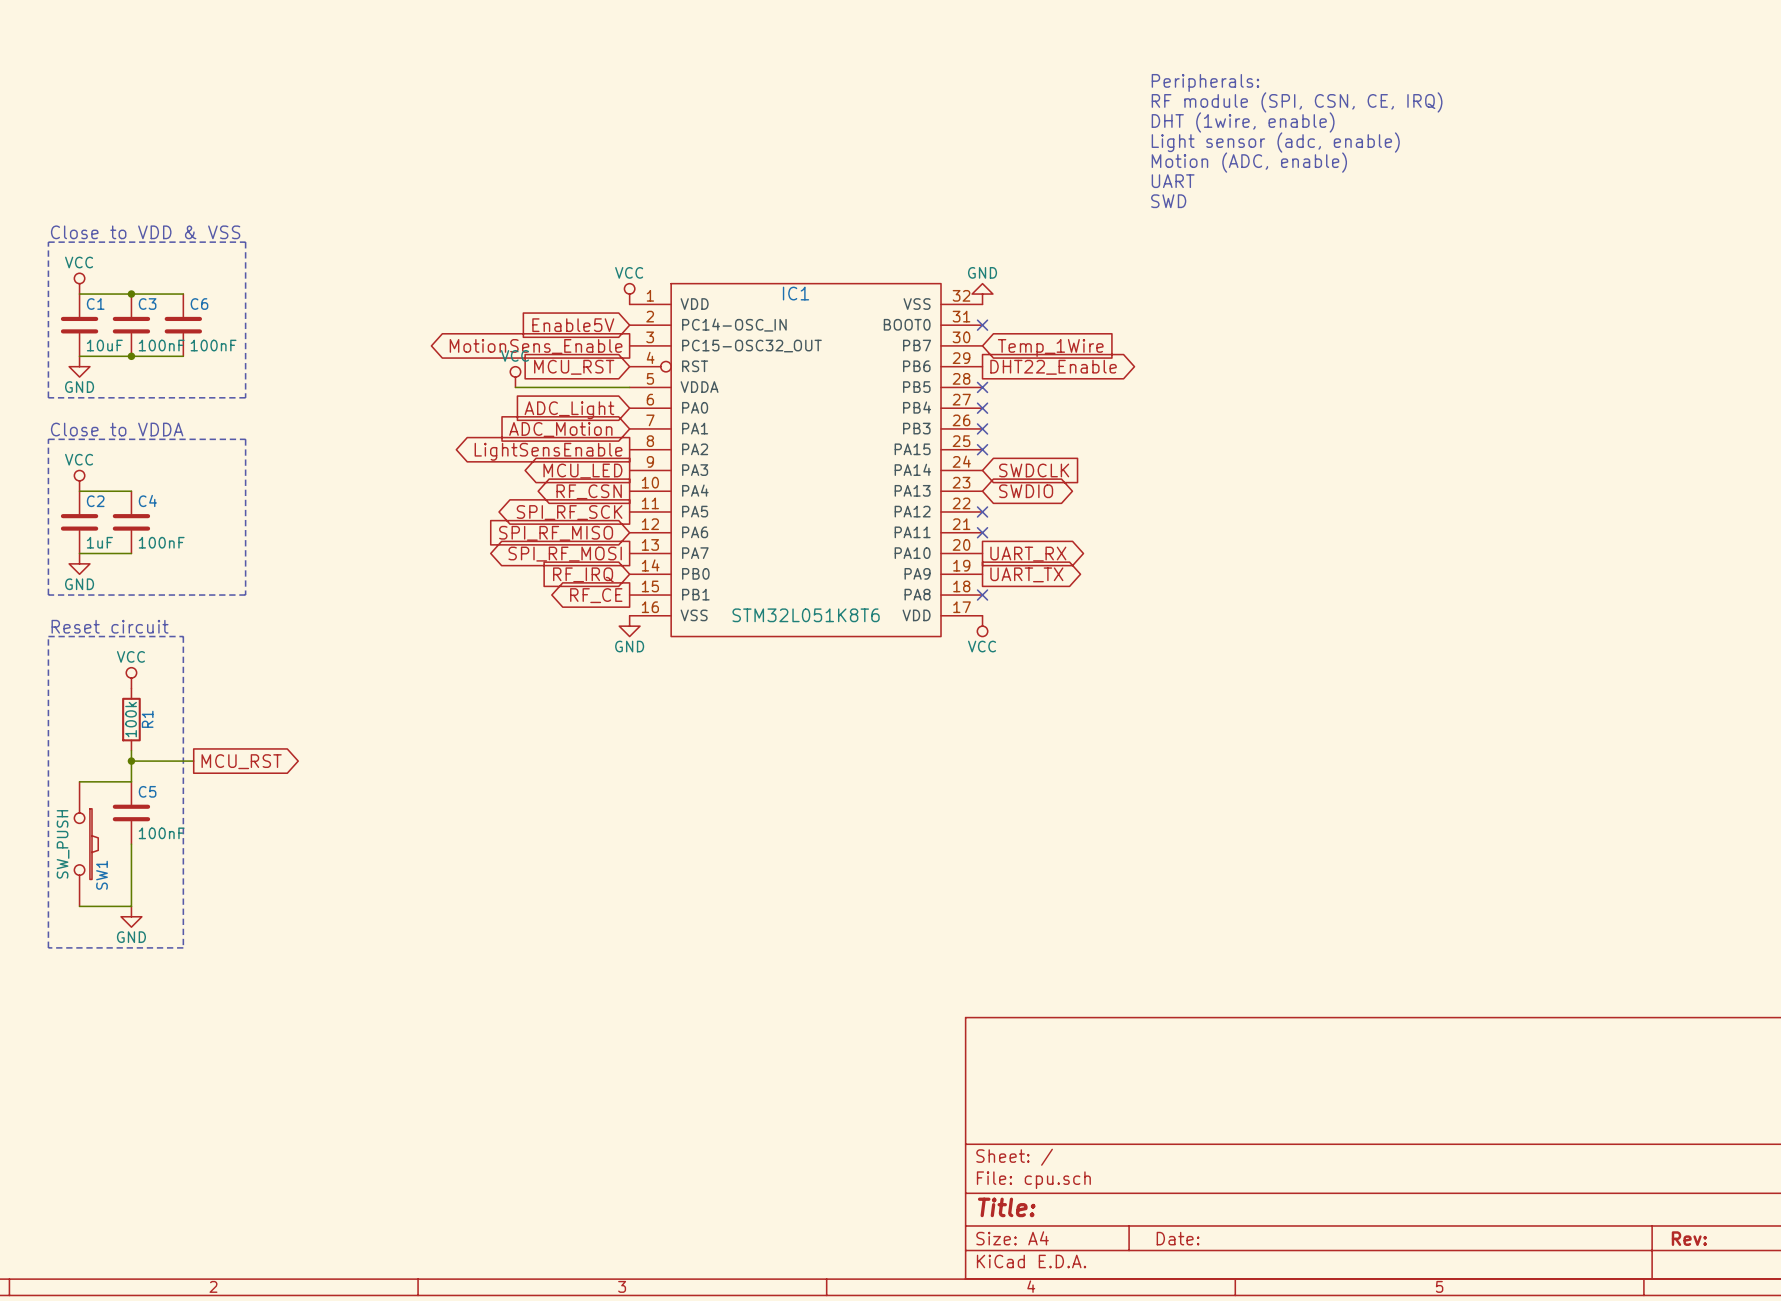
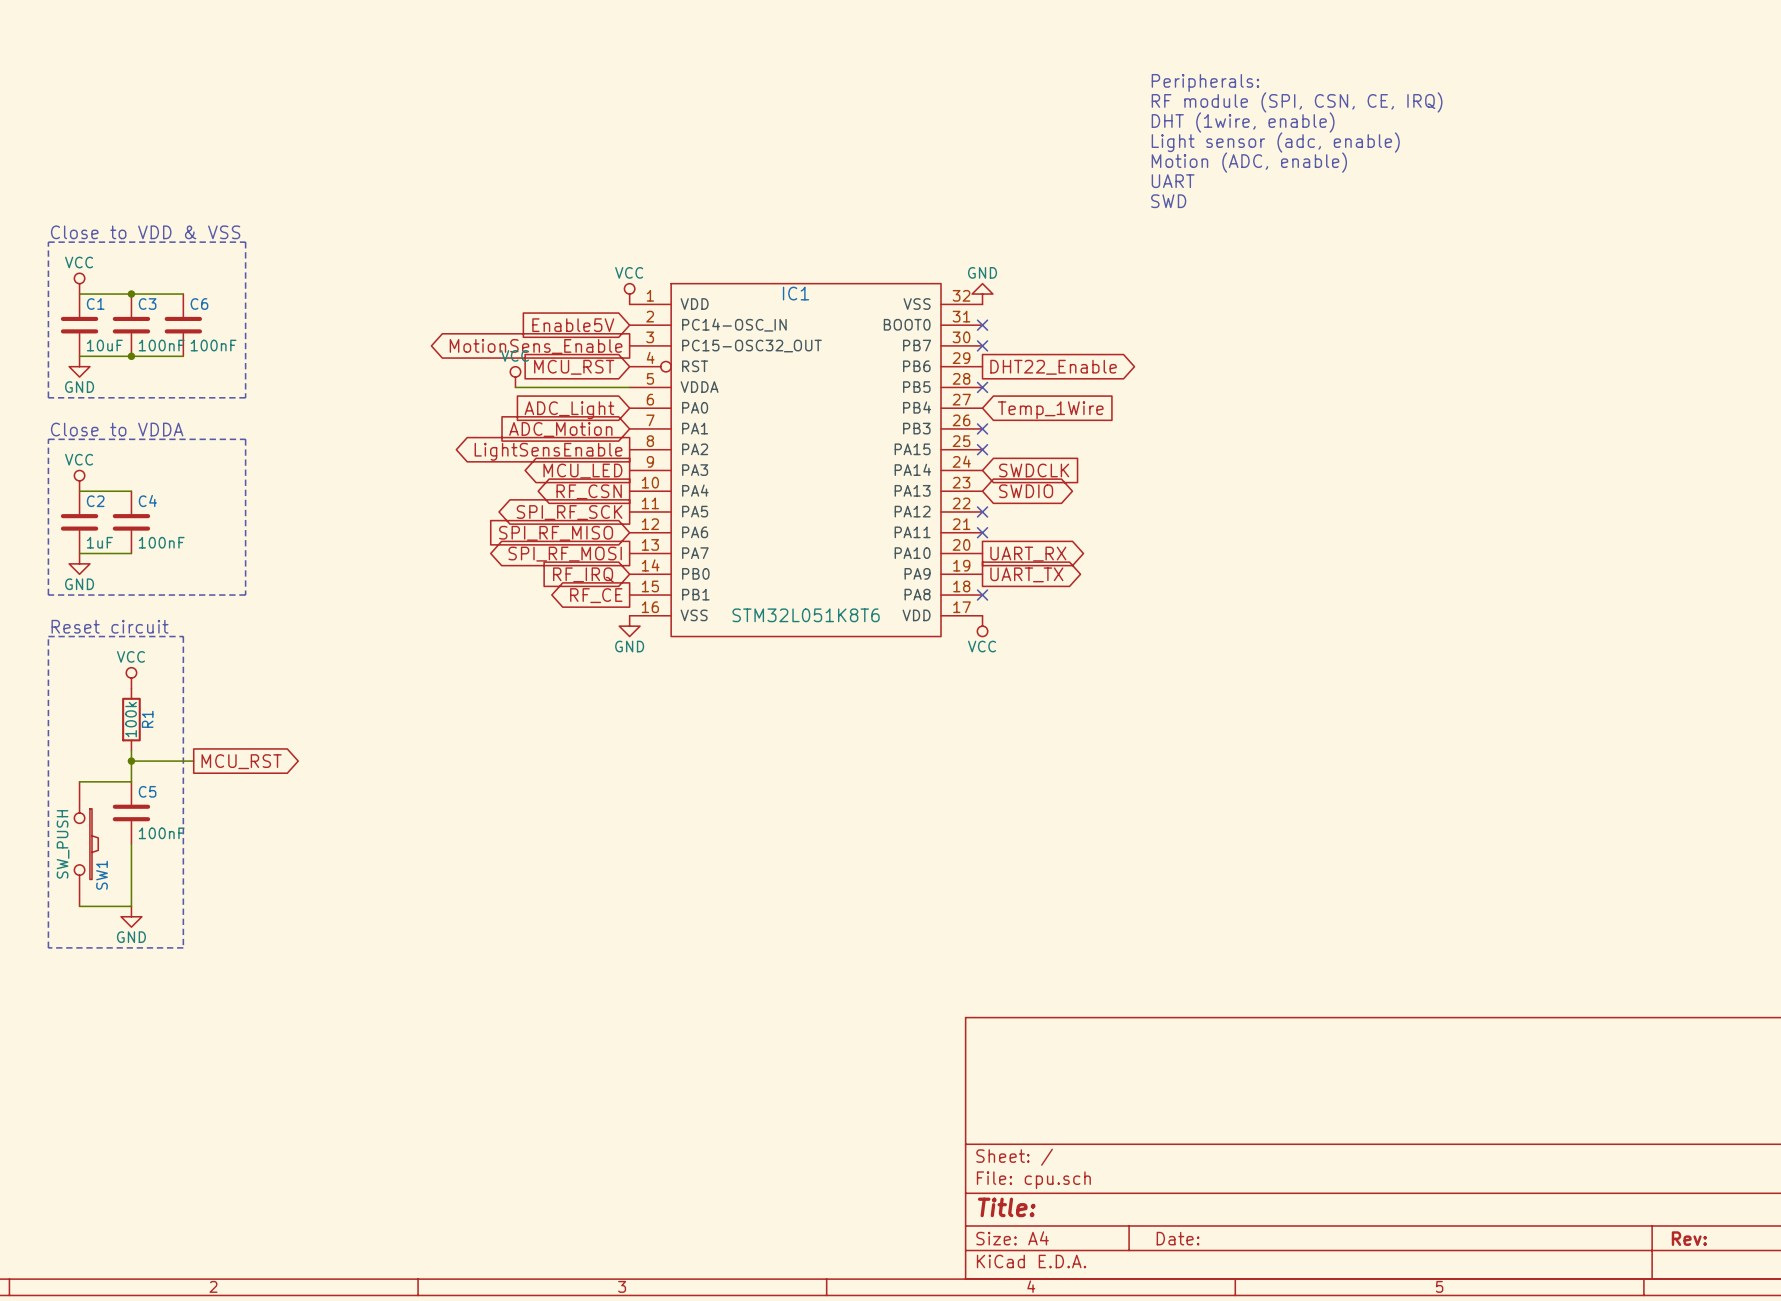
no-connect mark: none -> (982, 345)
global label position: Temp_1Wire (1050, 348) -> Temp_1Wire (1050, 410)
no-connect mark: (982, 408) -> none

